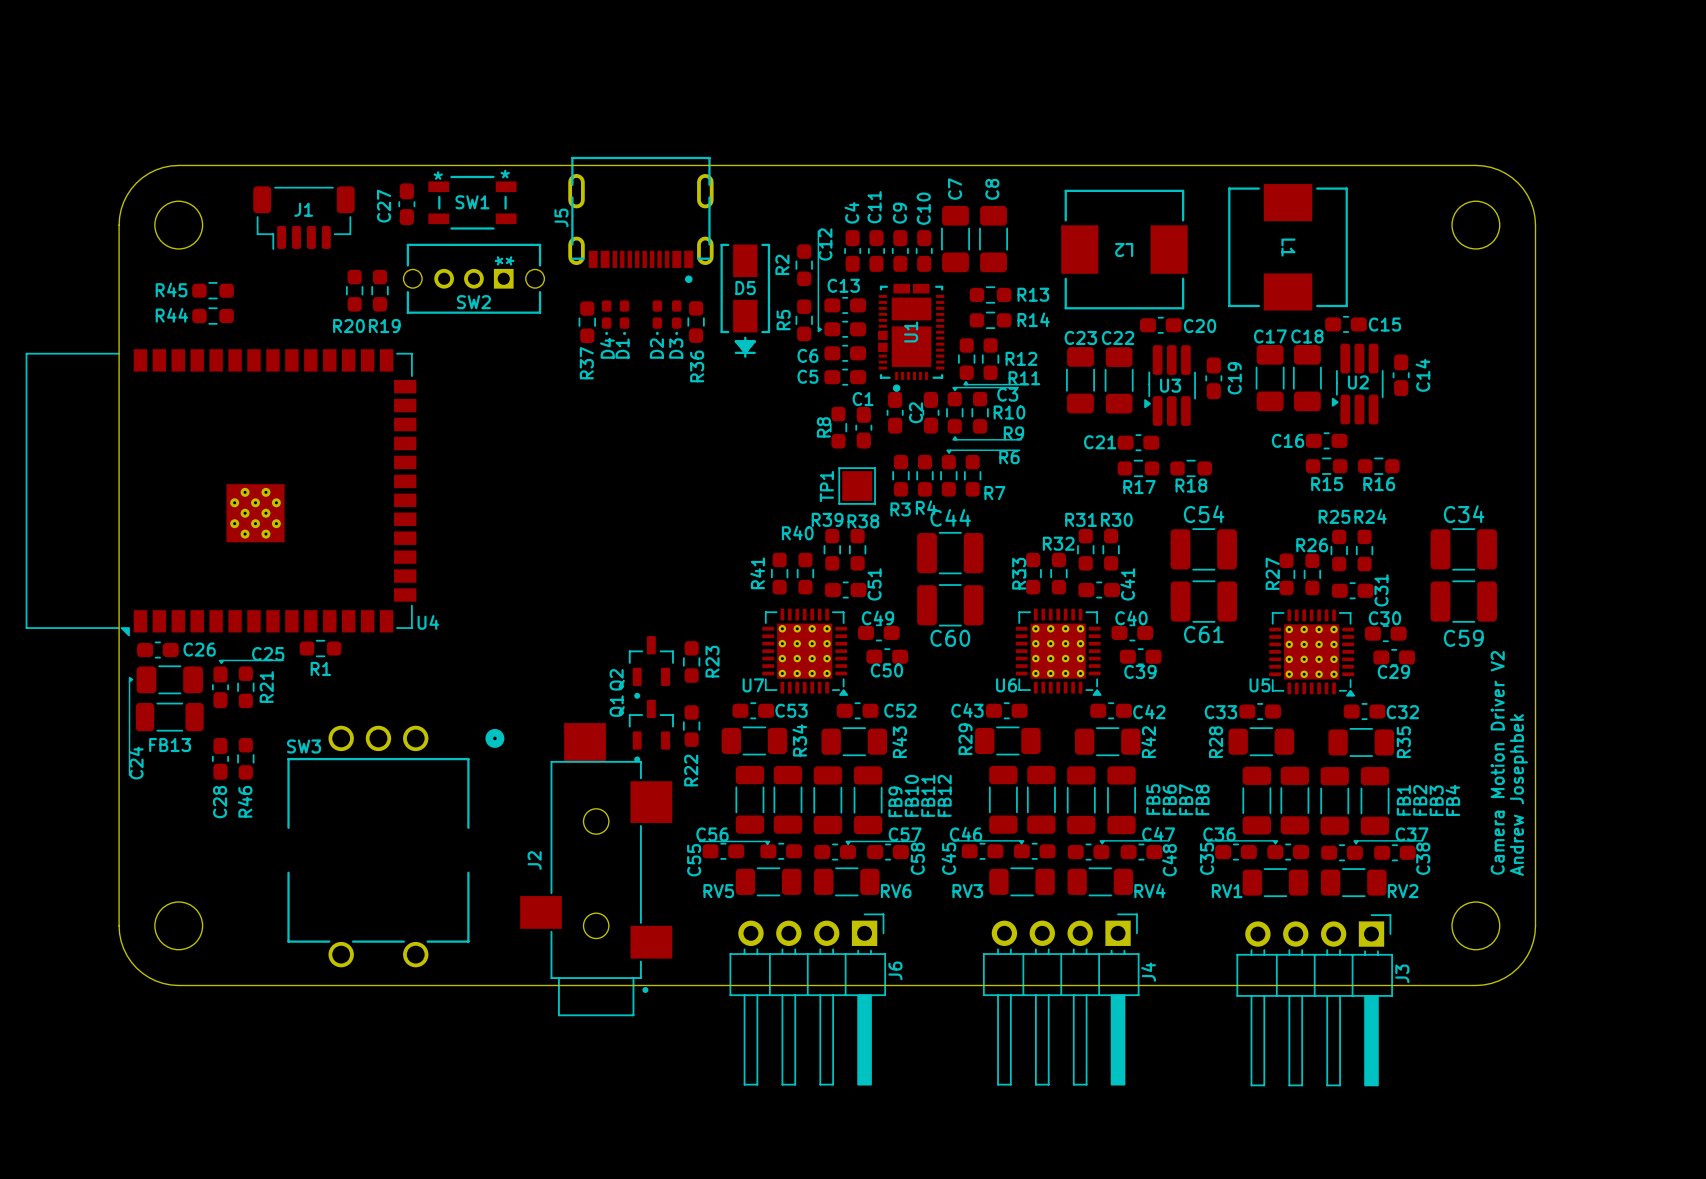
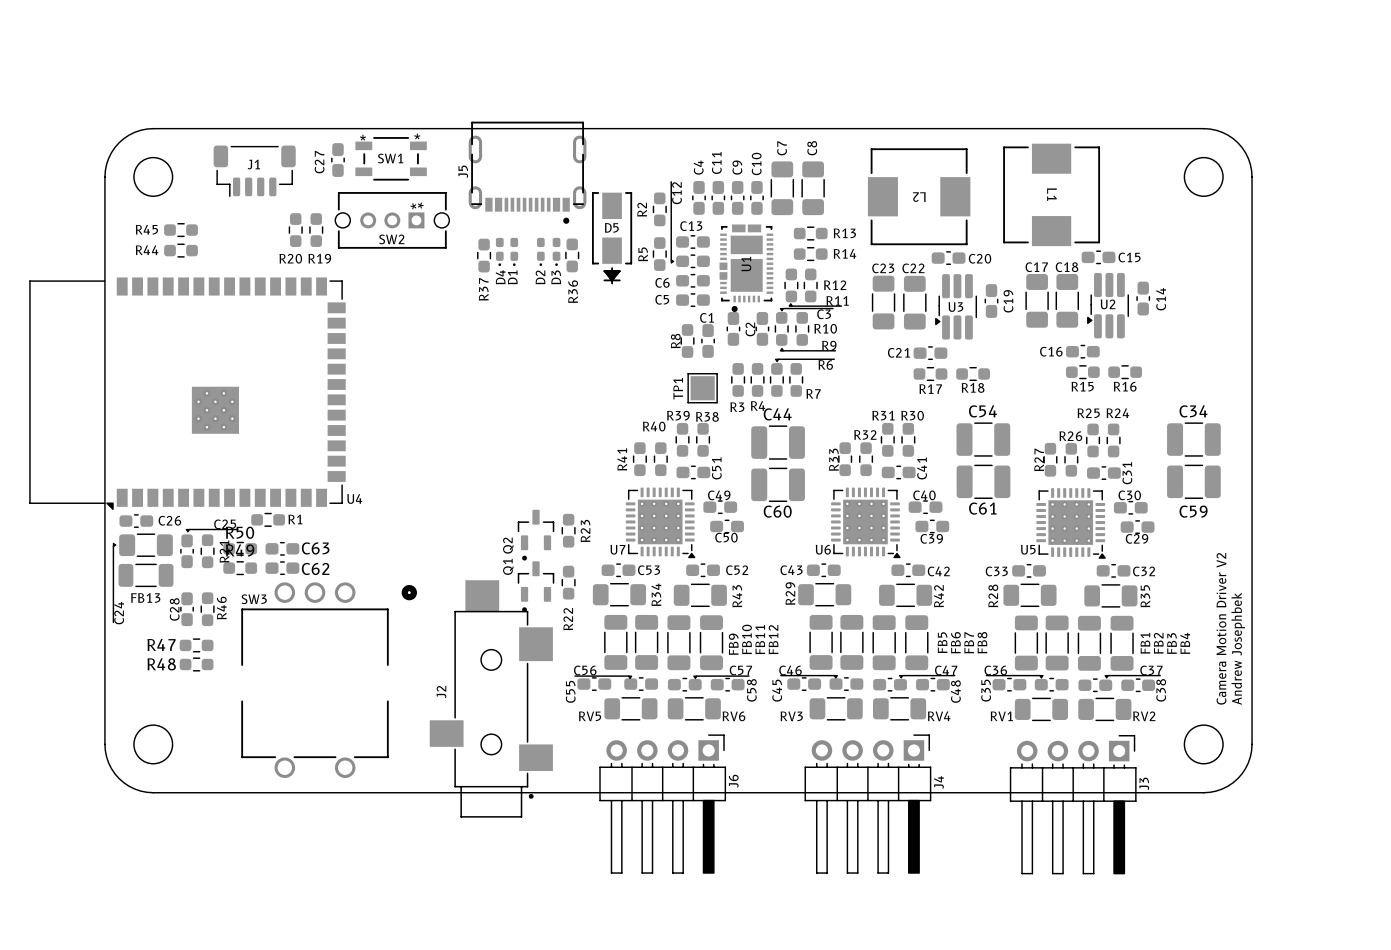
R1 name position: R1 (320, 668) -> R1 (295, 519)
R50: none -> (240, 548)
C63: none -> (282, 548)
R49: none -> (240, 568)
C62: none -> (282, 568)
R46 name position: R46 (245, 801) -> R46 (221, 608)
C28 name position: C28 (220, 802) -> C28 (174, 609)
R47: none -> (196, 645)
R48: none -> (196, 664)

